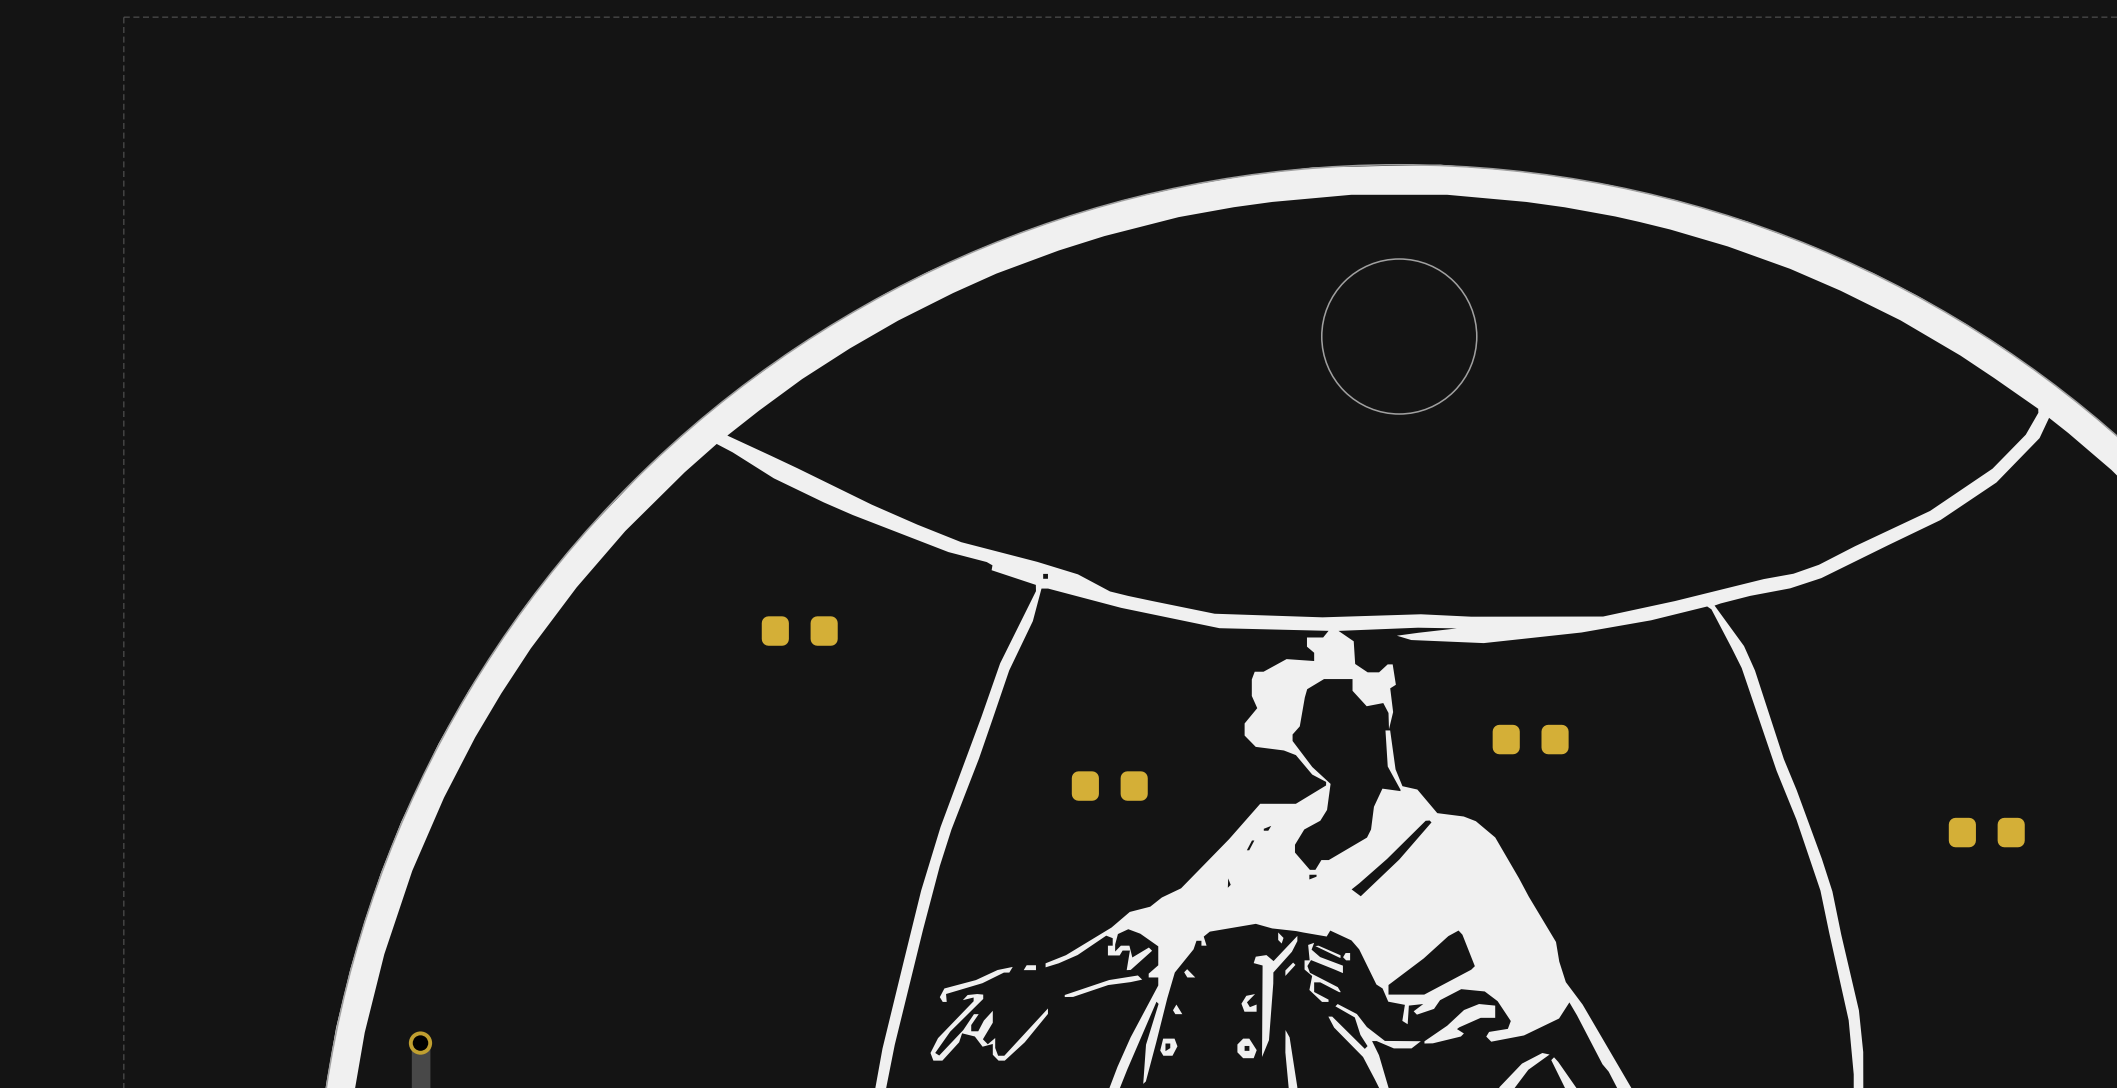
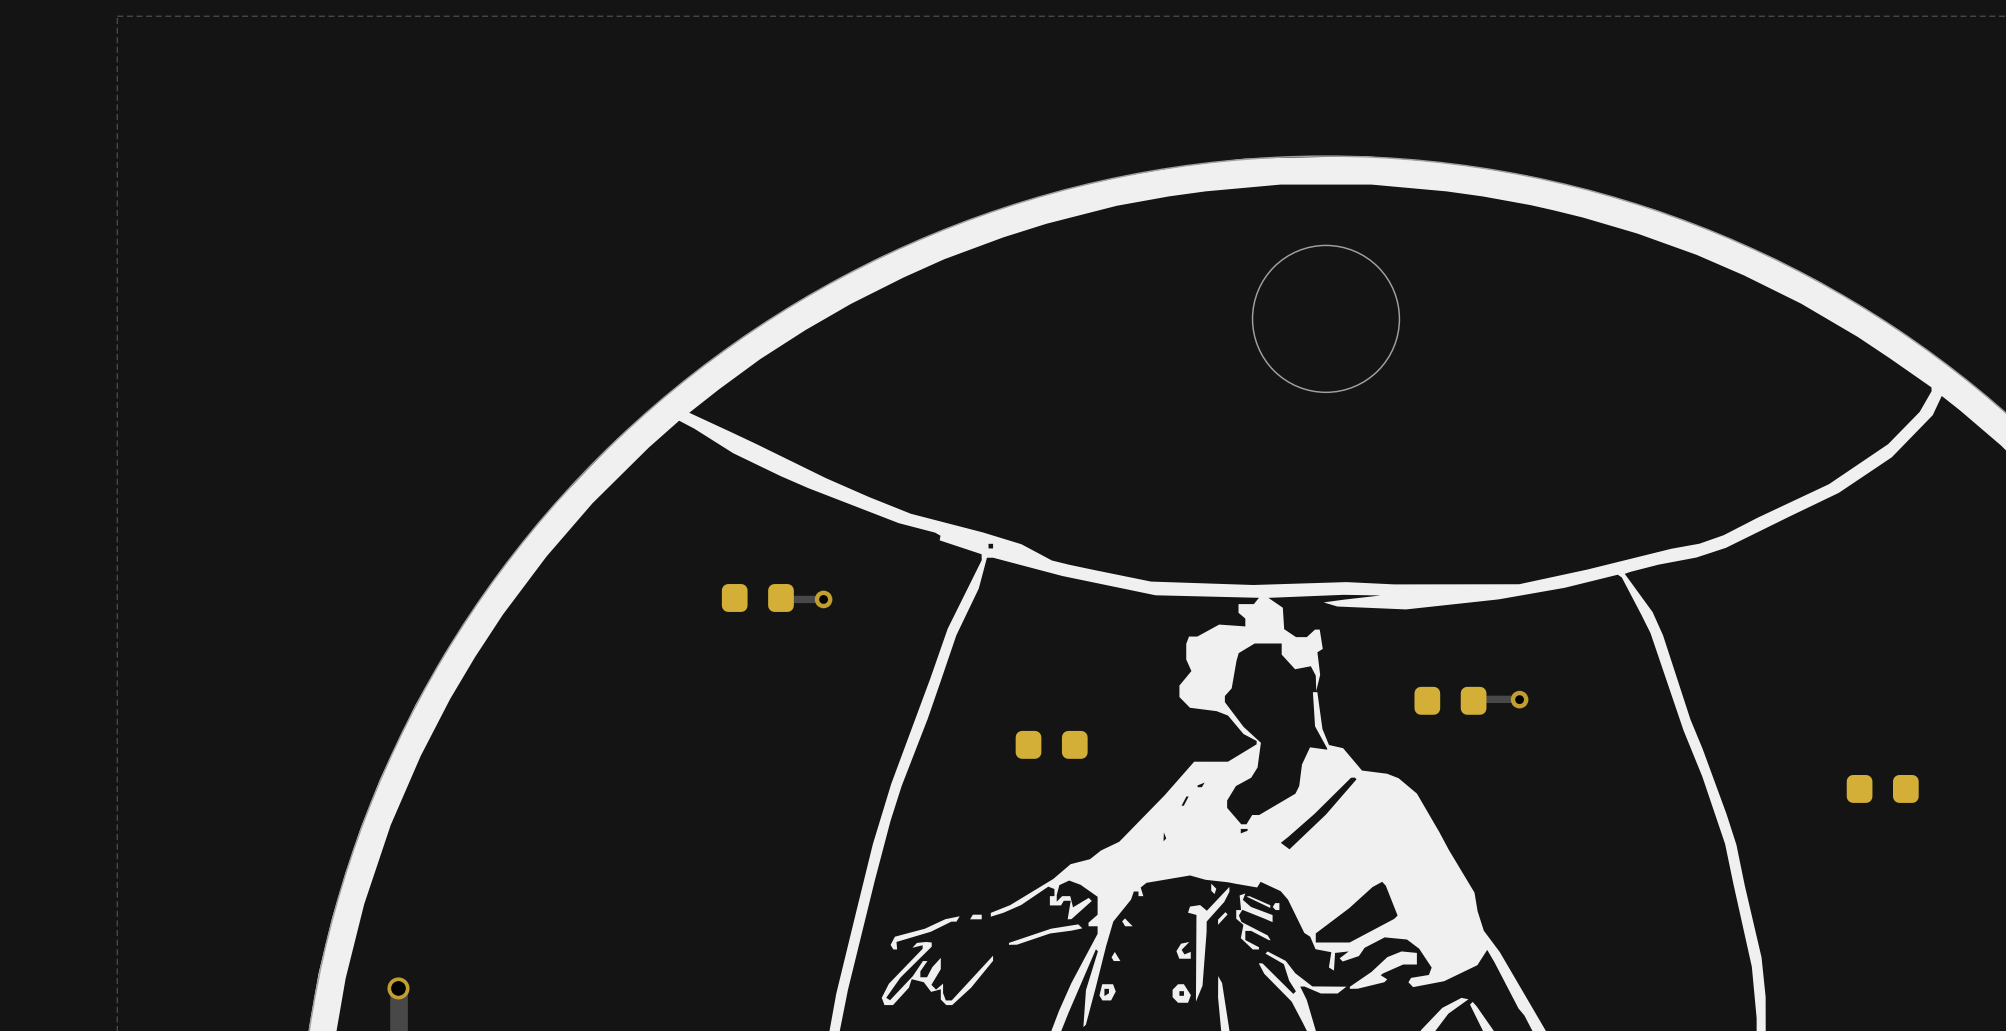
track: none -> (779, 597) (823, 599)
via: none -> (823, 599)
track: none -> (1473, 699) (1519, 699)
via: none -> (1519, 699)

